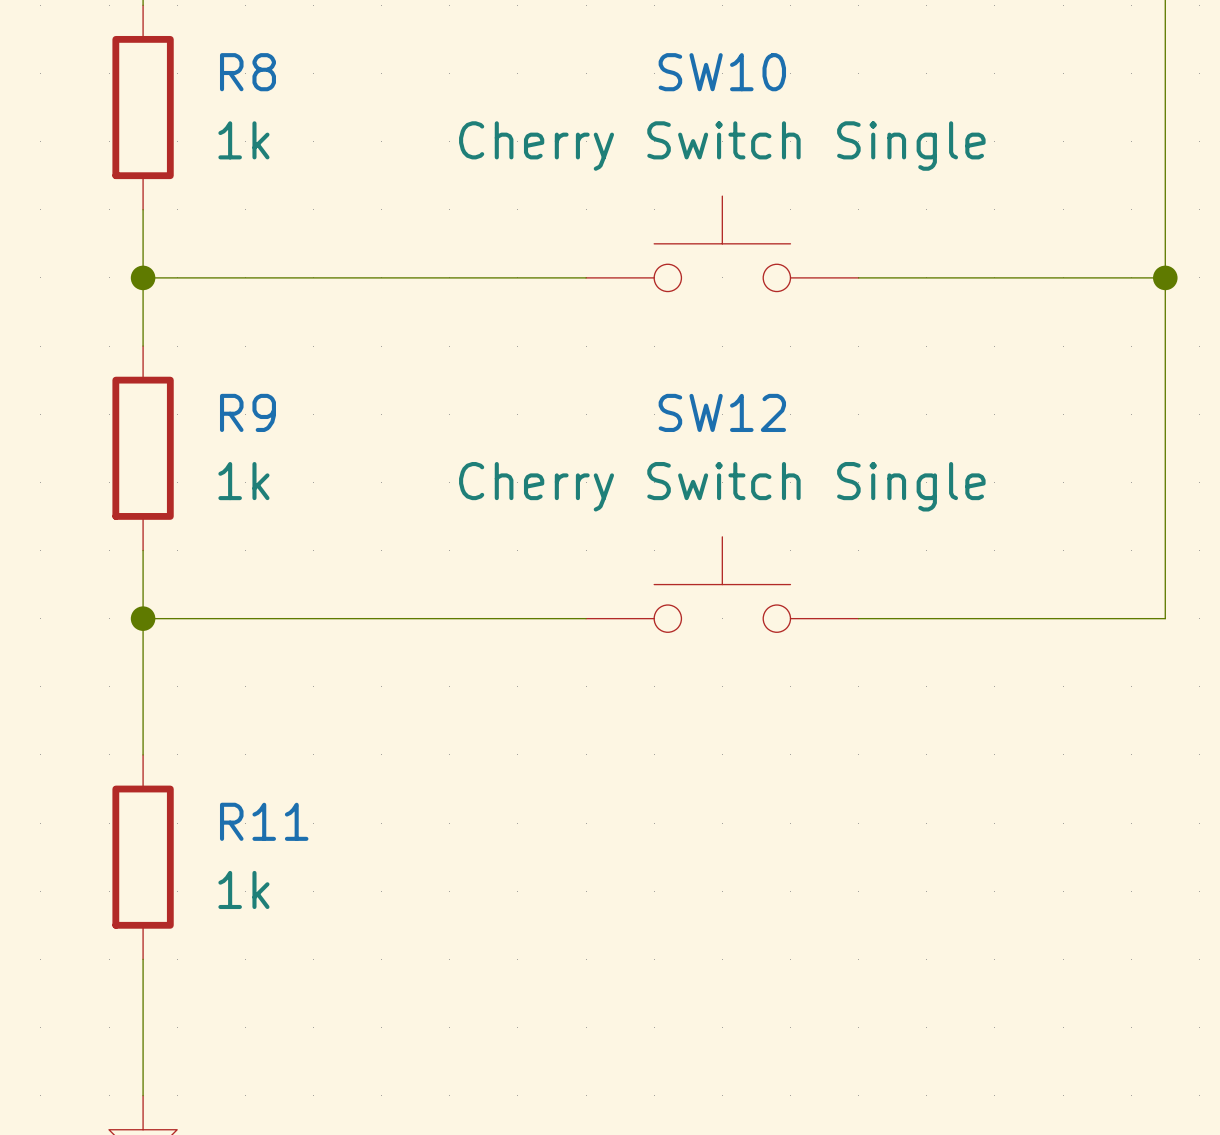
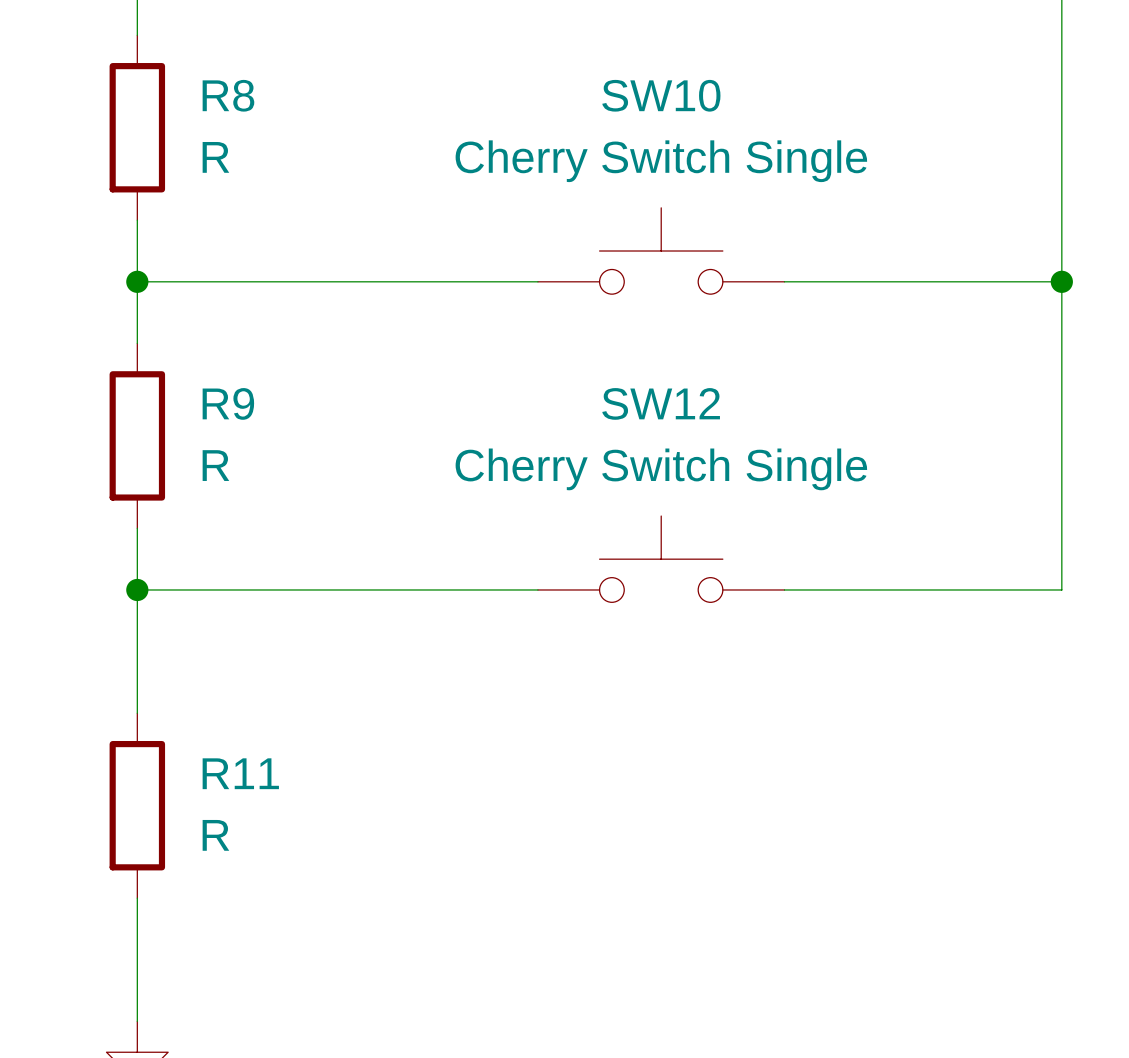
R8 value: 1k (243, 140) -> R (215, 157)
R9 value: 1k (243, 481) -> R (215, 465)
R11 value: 1k (243, 889) -> R (215, 835)

